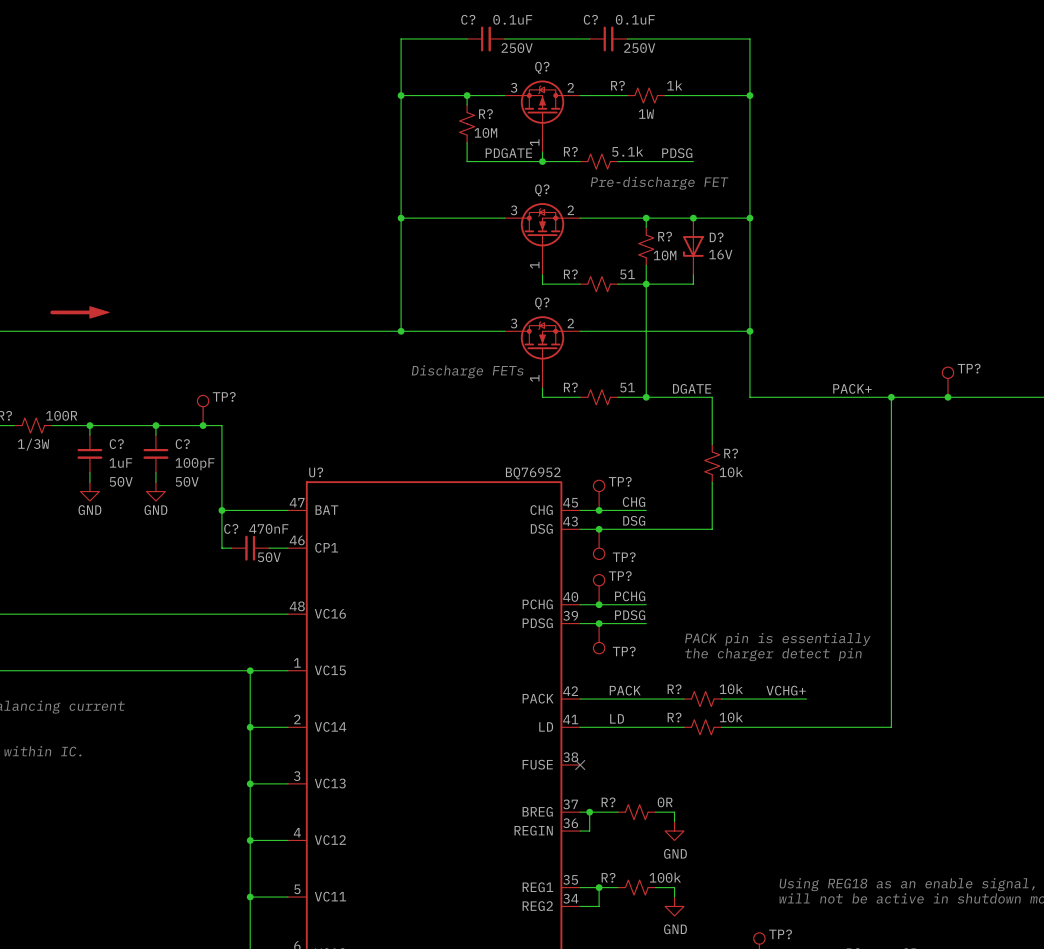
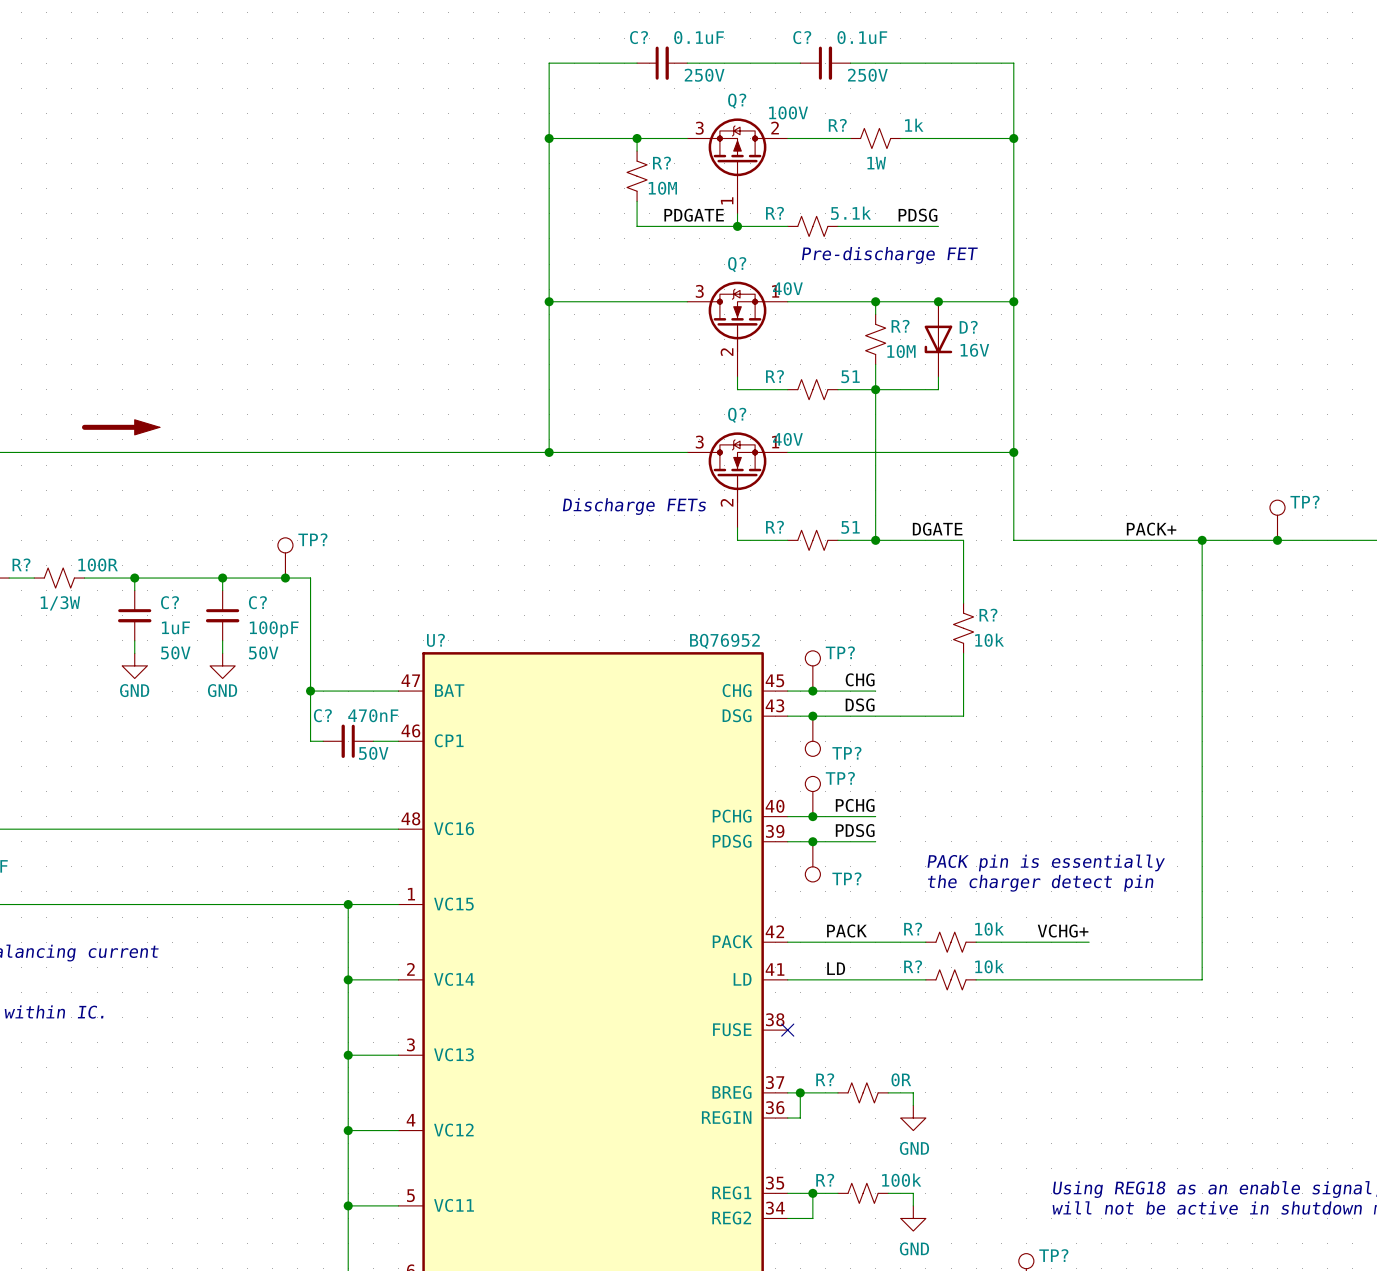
Q? text: none -> 100V (788, 112)
Q? symbol: [504, 203, 581, 275] -> [687, 281, 788, 378]
Q? text: none -> 40V (787, 288)
Q? symbol: [504, 316, 581, 388] -> [687, 432, 788, 528]
Q? text: none -> 40V (787, 439)

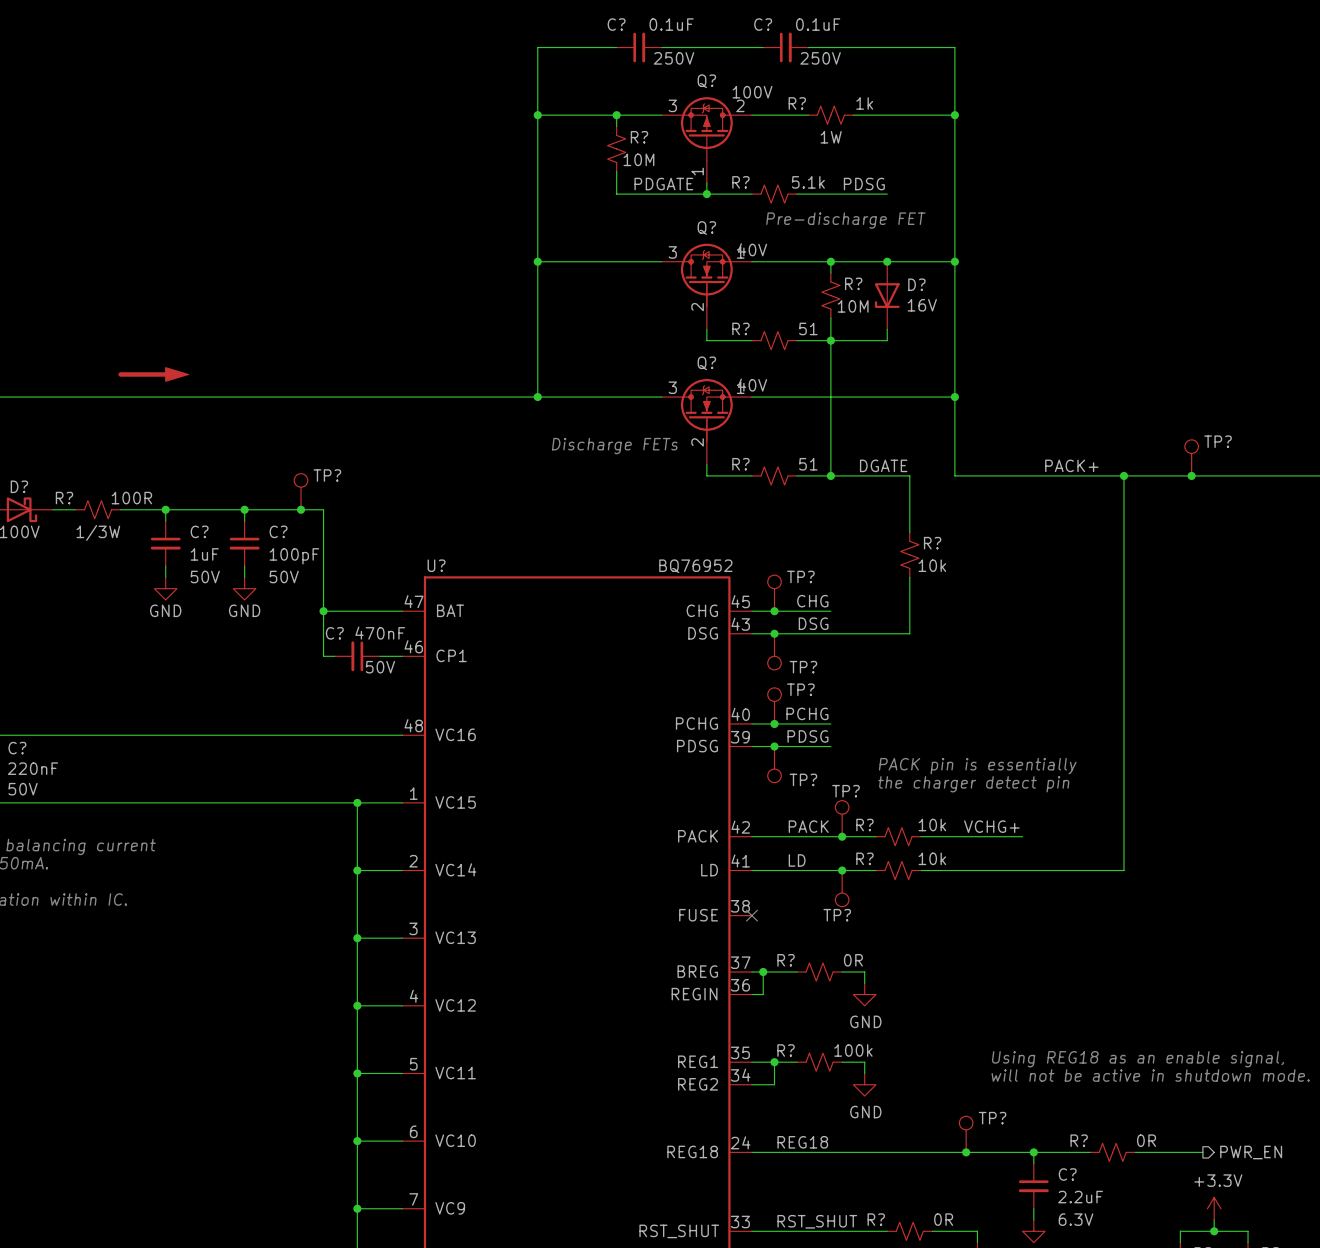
TP?: none -> (842, 818)
junction: none -> (842, 836)
junction: none -> (842, 870)
TP?: none -> (842, 888)

